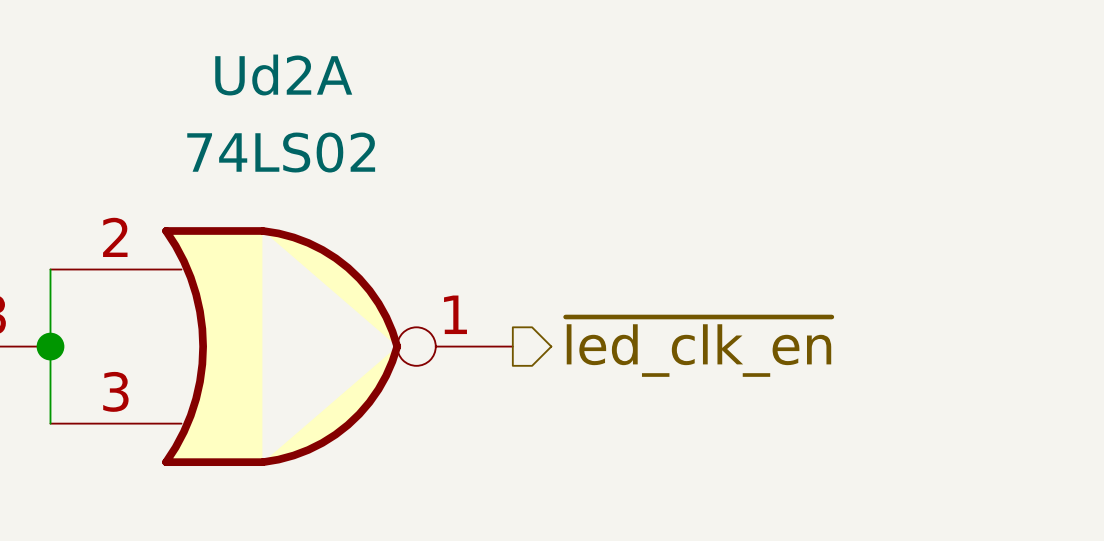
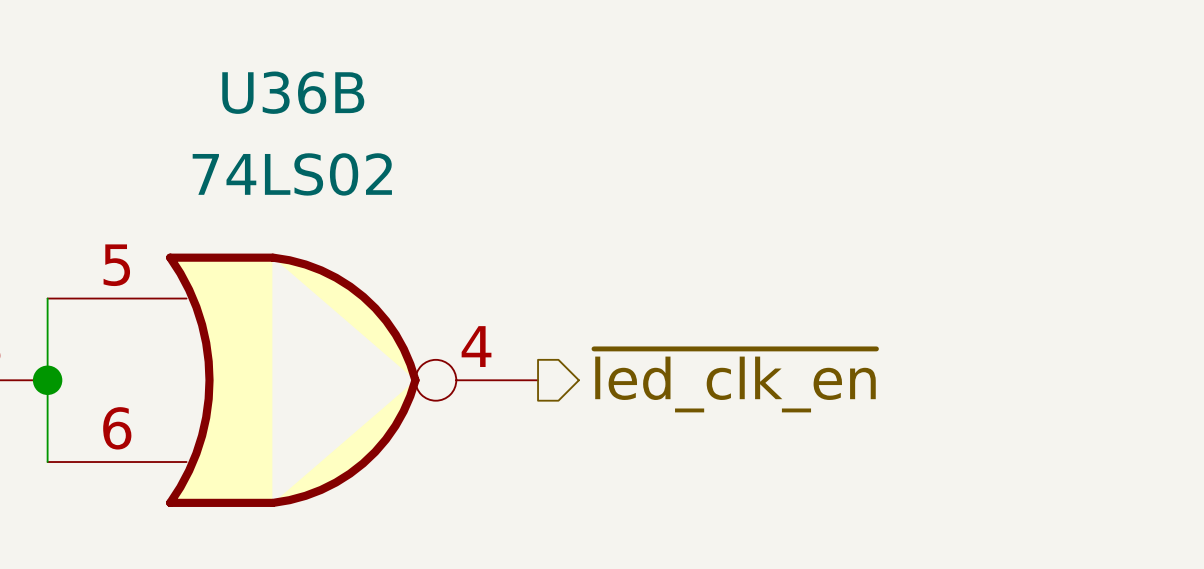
Ud2A name: Ud2A (283, 75) -> U36B (293, 92)
Ud2A pin number: 2 (115, 237) -> 5 (116, 265)
Ud2A pin number: 1 (455, 314) -> 4 (476, 346)
Ud2A pin number: 3 (115, 391) -> 6 (117, 428)

